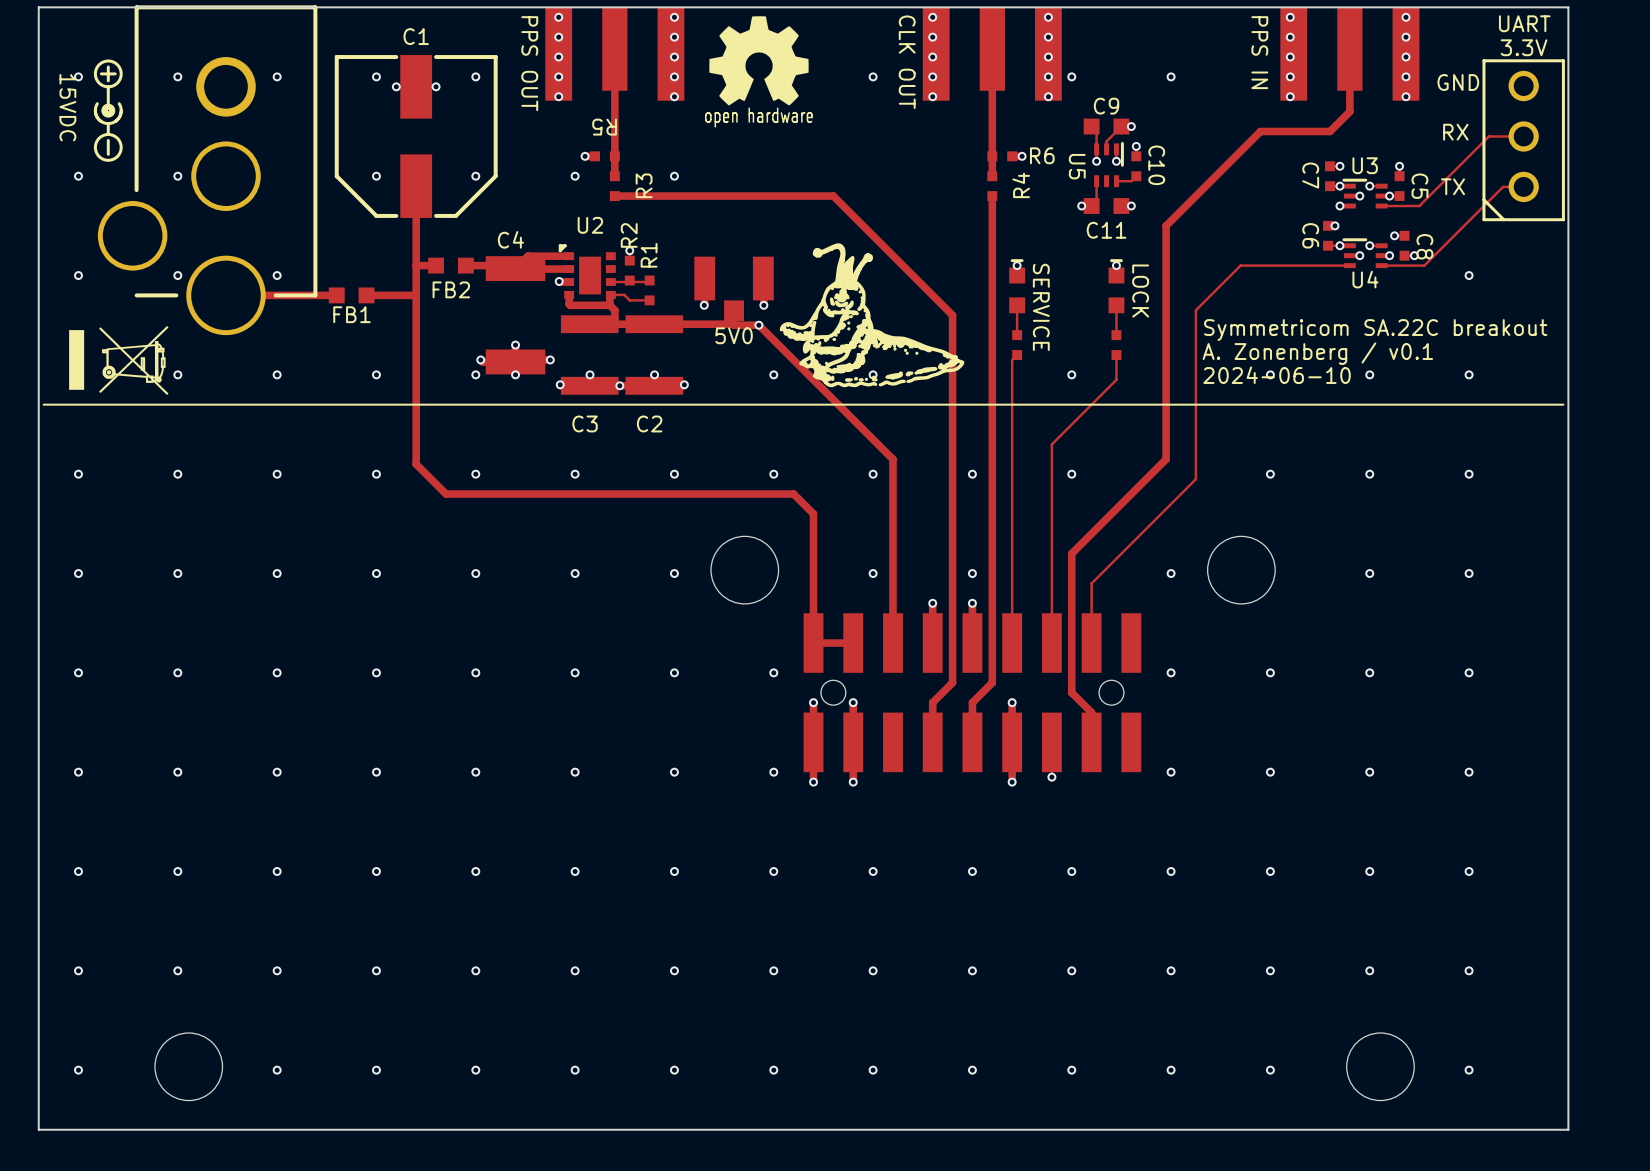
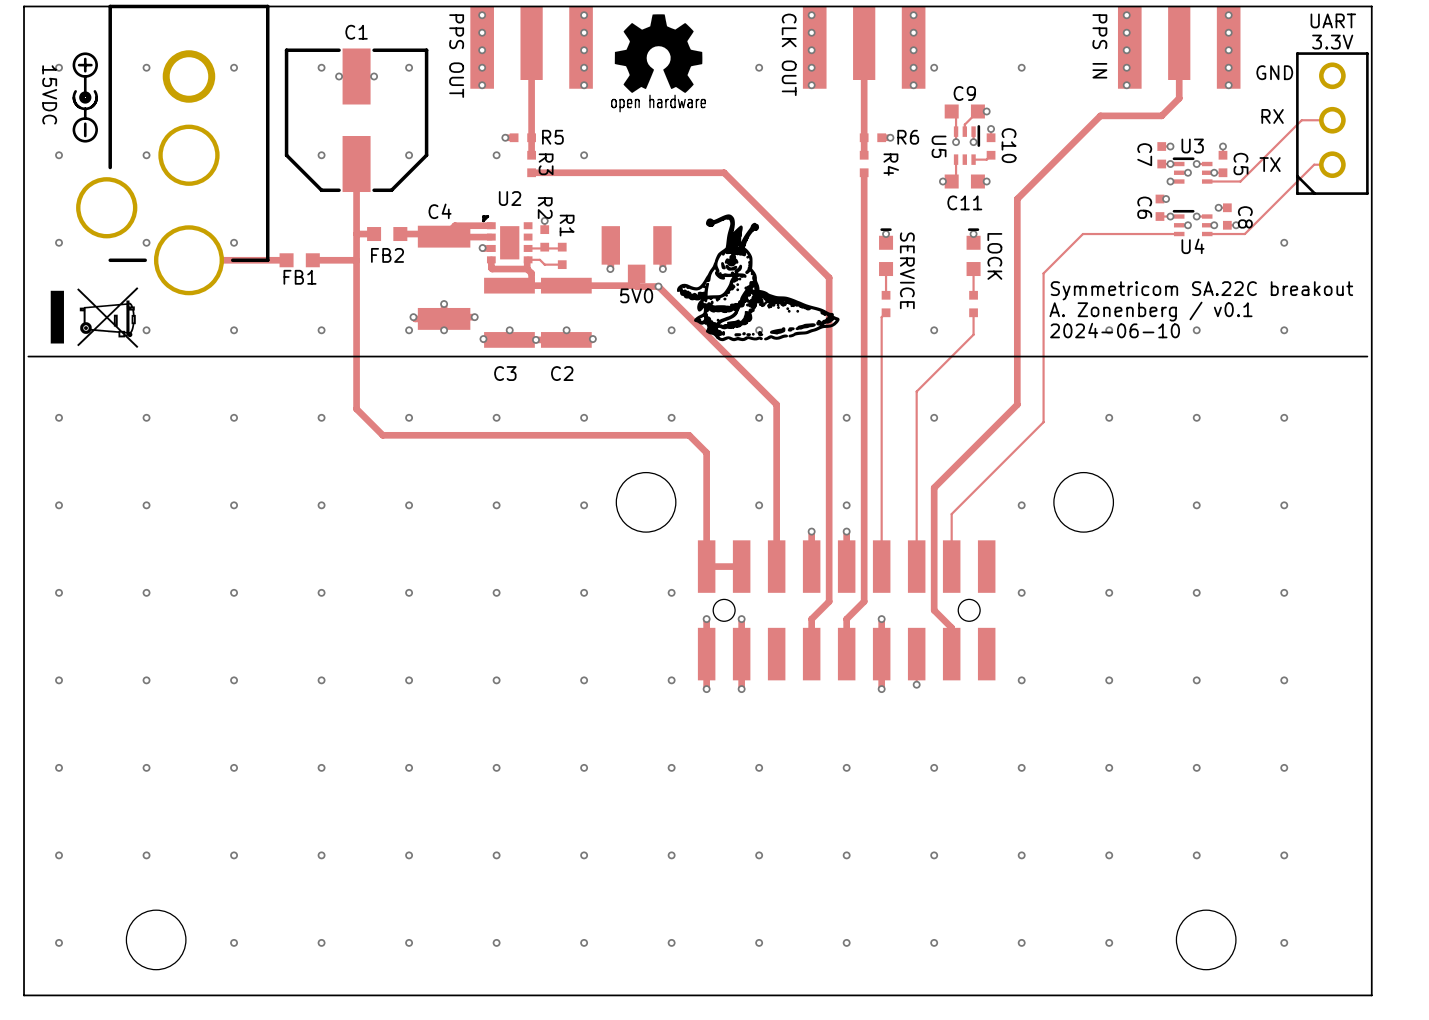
R5 name rotation: 0° (604, 127) -> 180° (552, 137)
R5 name position: R5 (604, 127) -> R5 (552, 137)
R3 name rotation: 0° (644, 185) -> 180° (546, 164)
R4 name rotation: 0° (1021, 185) -> 180° (891, 164)
R2 name rotation: 0° (629, 235) -> 180° (545, 208)
R1 name rotation: 0° (649, 255) -> 180° (567, 225)

